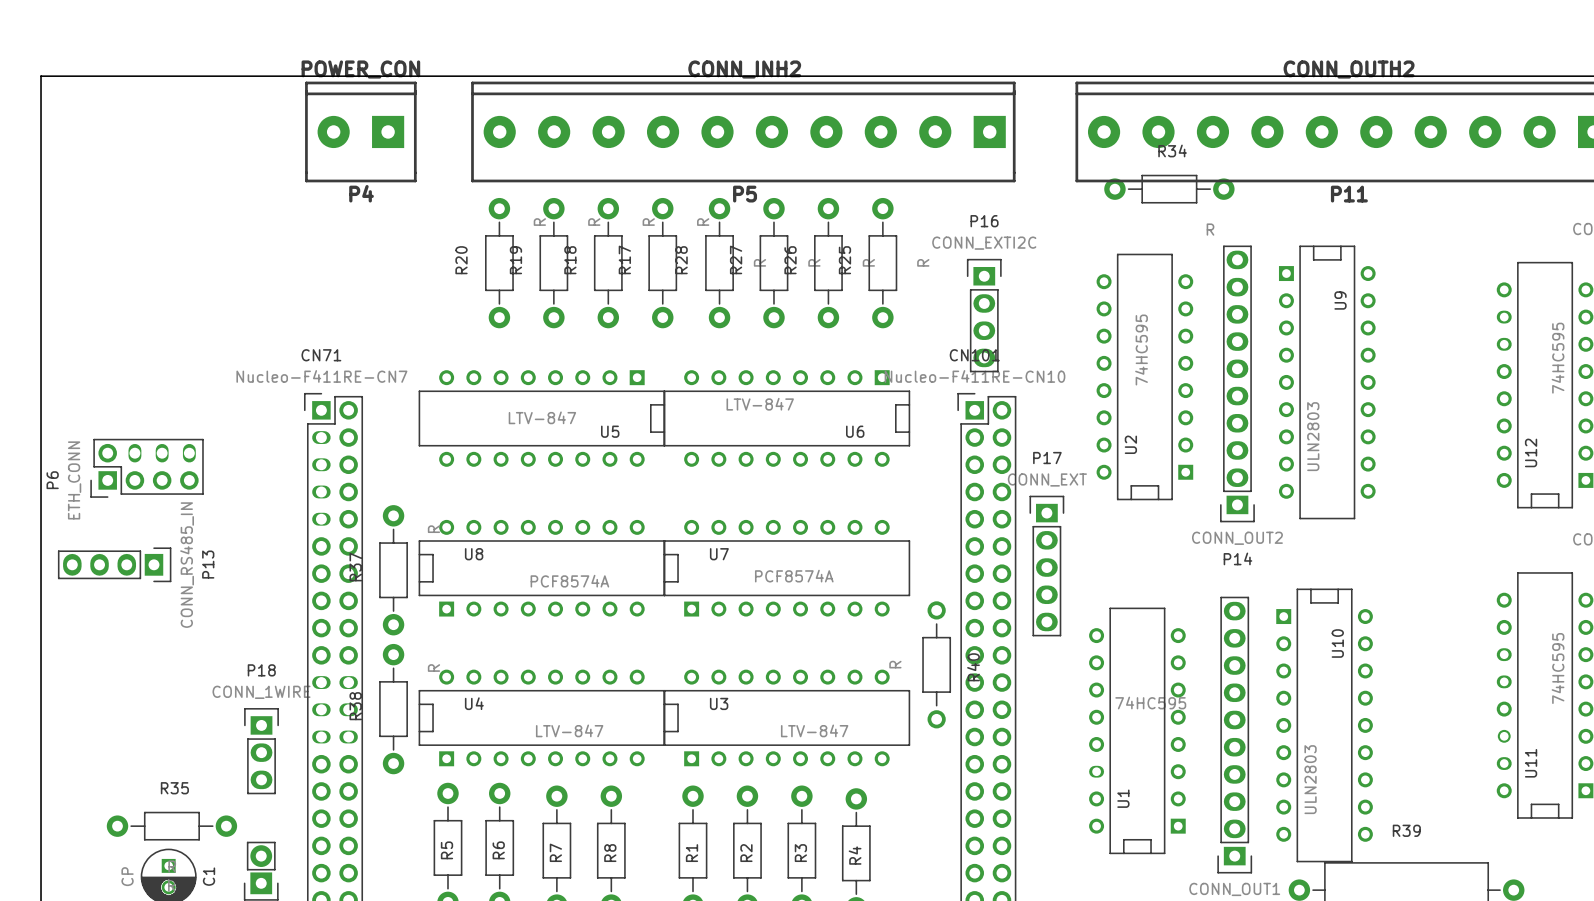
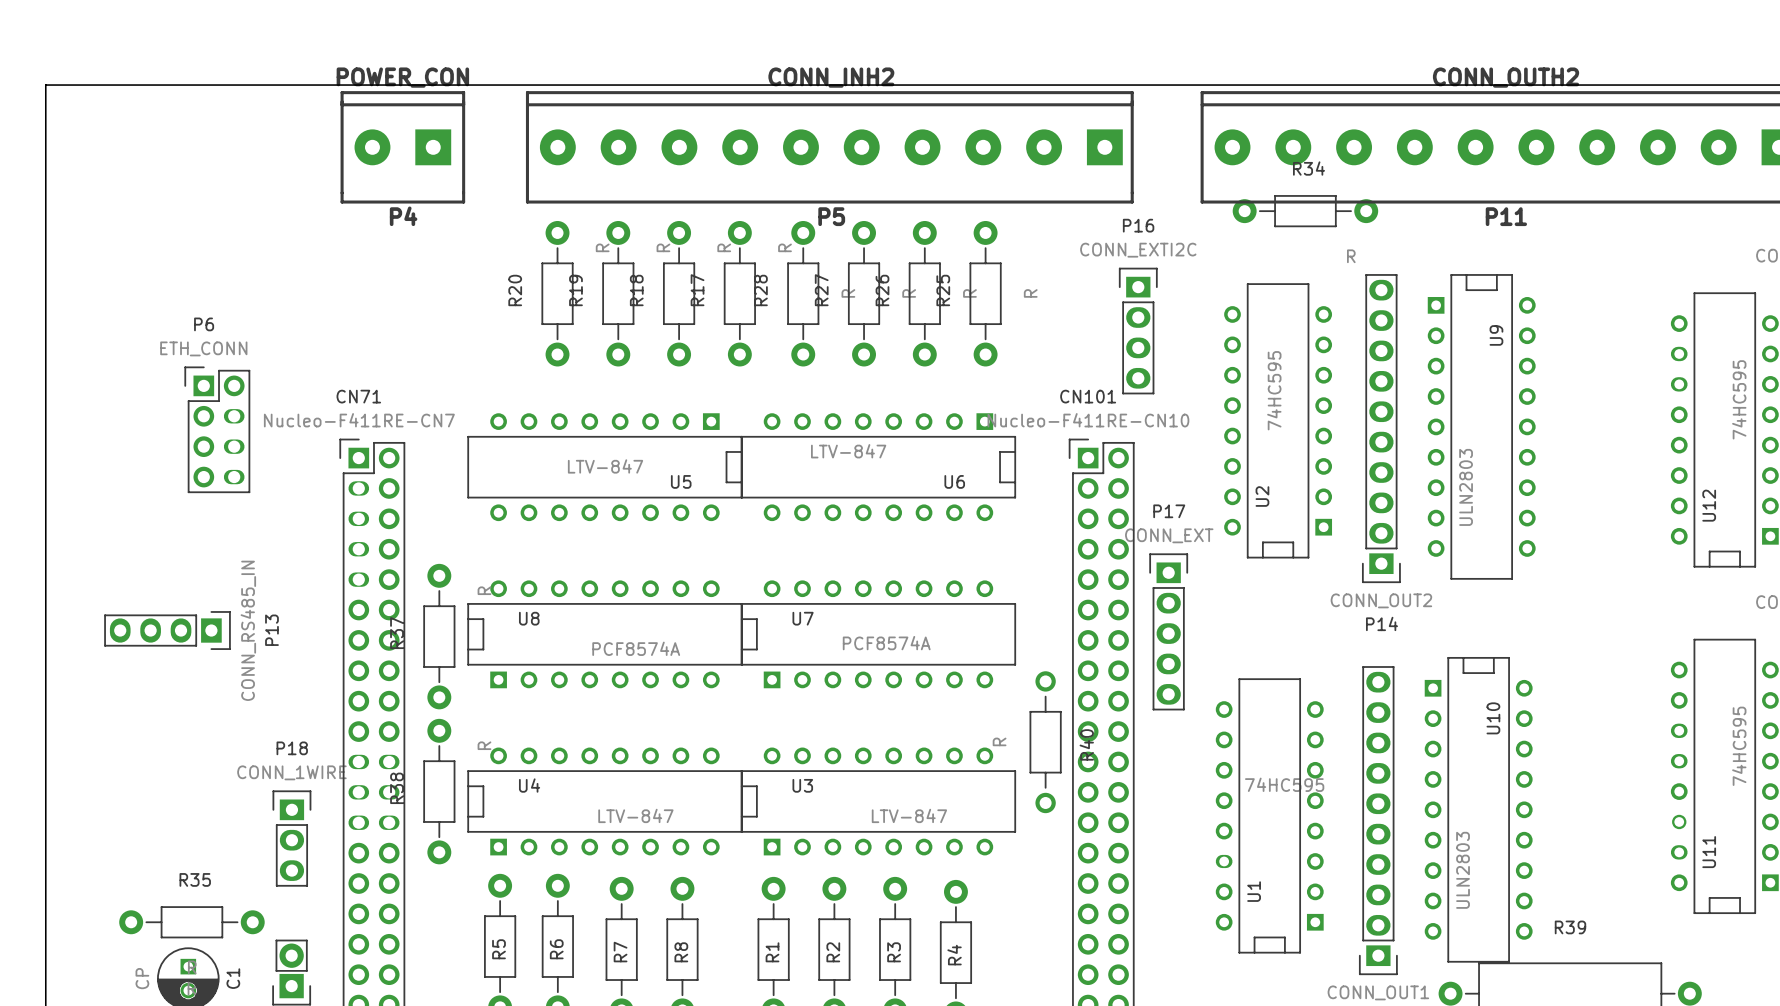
P16 position: (984, 315) -> (1138, 331)
P6 rotation: 0° (147, 468) -> 90° clockwise (217, 429)
P6 position: (147, 468) -> (217, 429)
P13 position: (114, 564) -> (167, 630)

